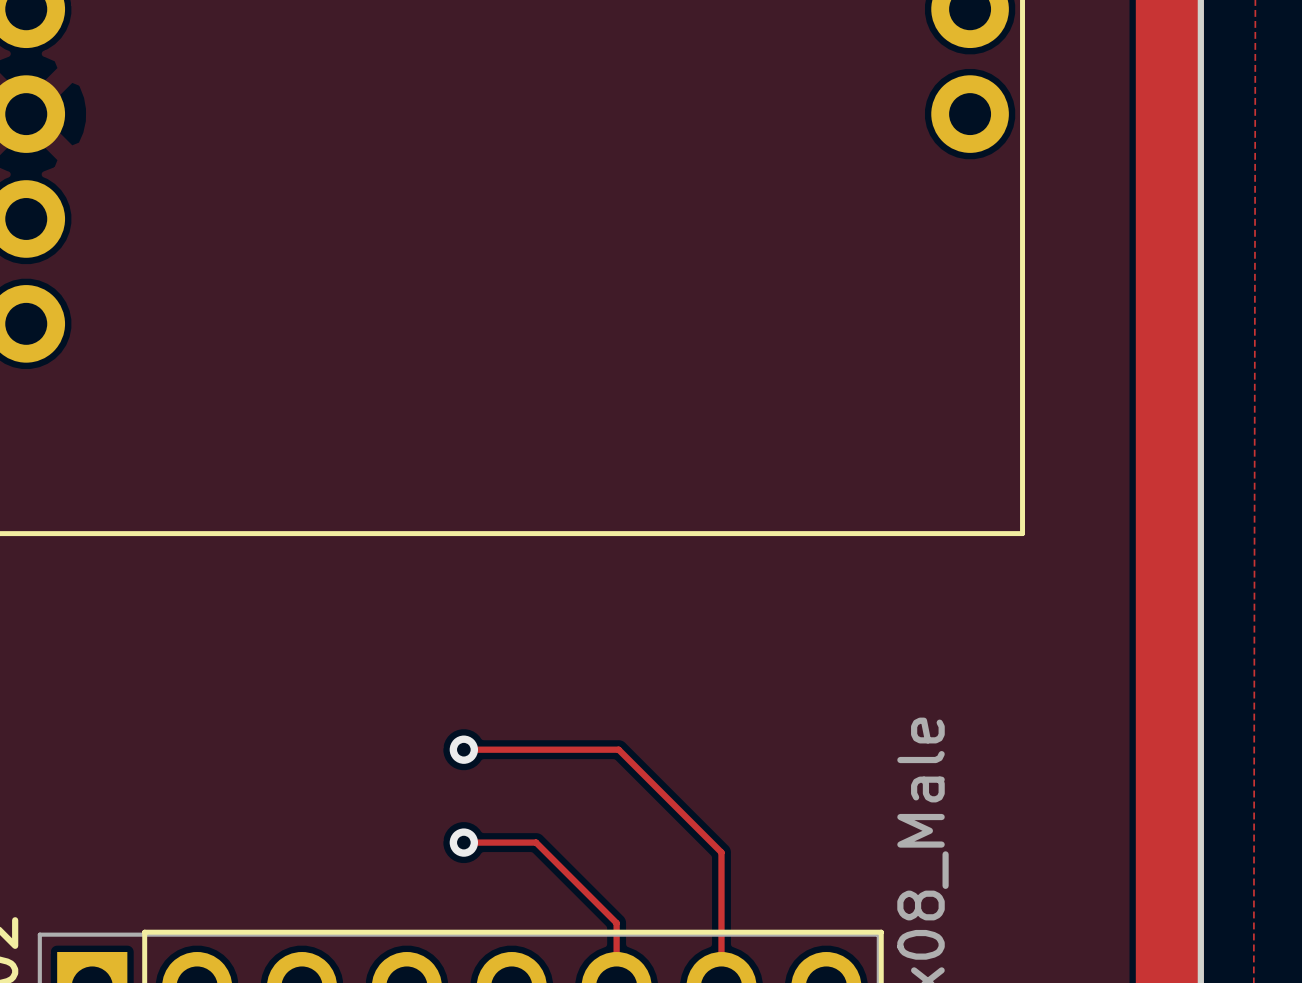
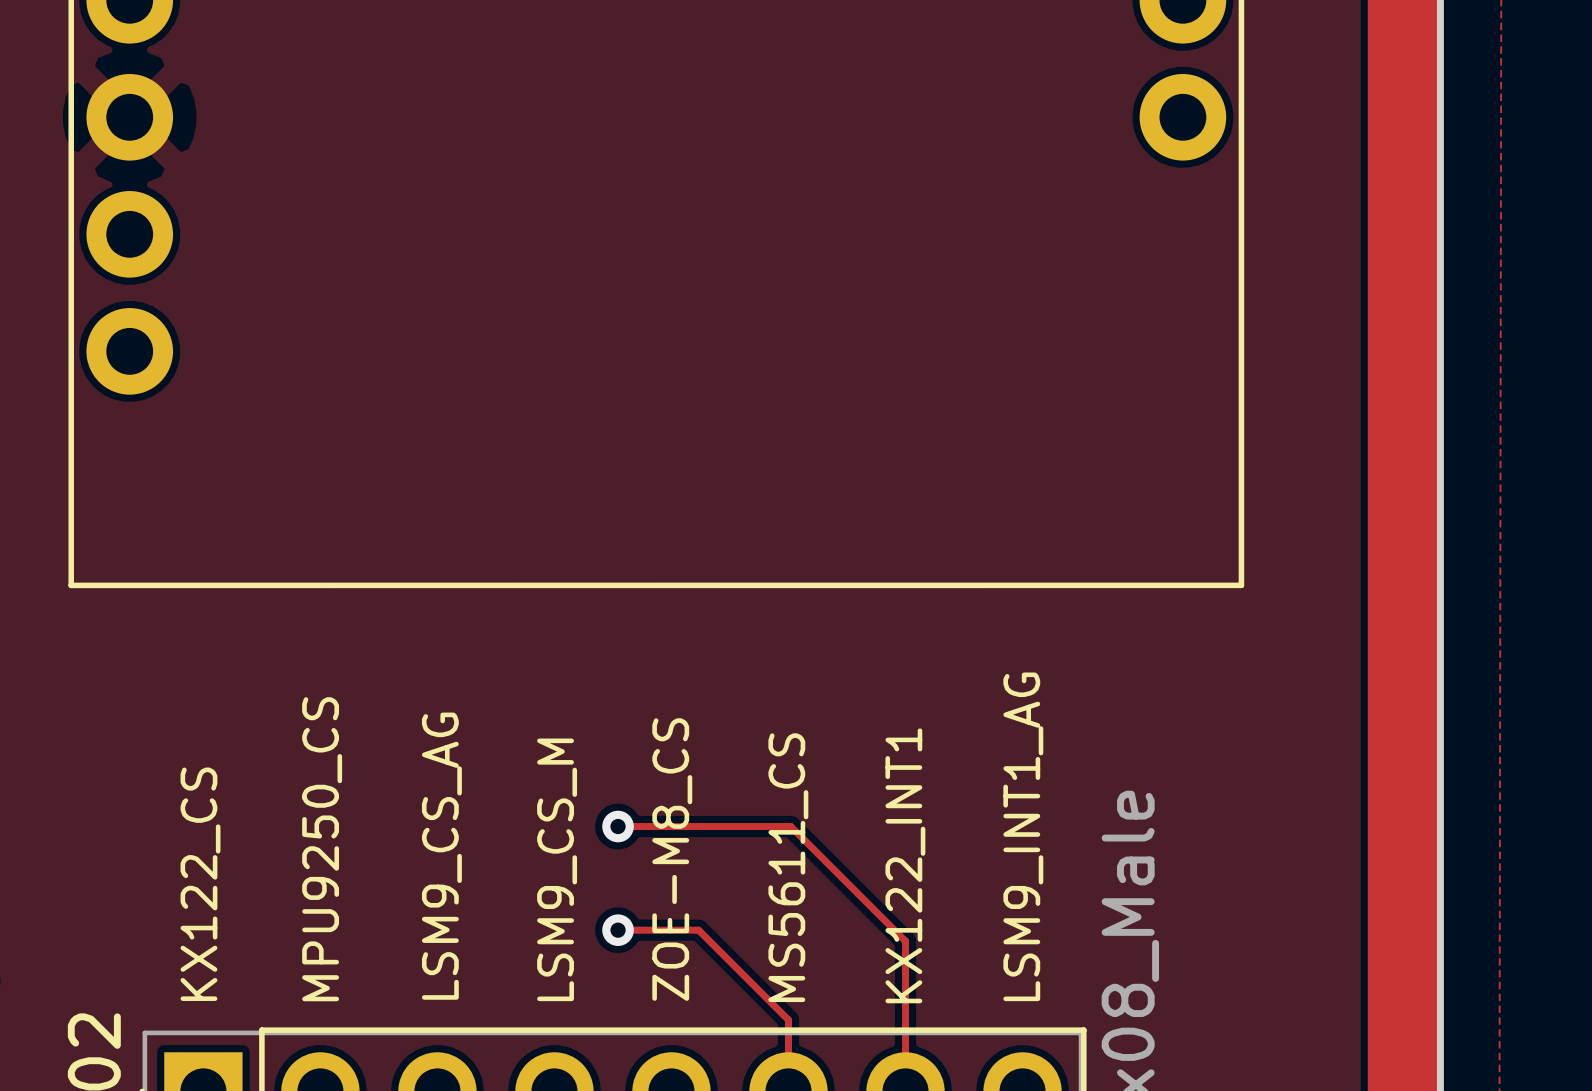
text: none -> LSM9_INT1_AG (1023, 836)
text: none -> MPU9250_CS (322, 849)
text: none -> LSM9_CS_AG (441, 856)
text: none -> ZOE-M8_CS (672, 859)
text: none -> KX122_INT1 (905, 865)
text: none -> MS5611_CS (788, 867)
text: none -> LSM9_CS_M (557, 869)
text: none -> KX122_CS (200, 884)

